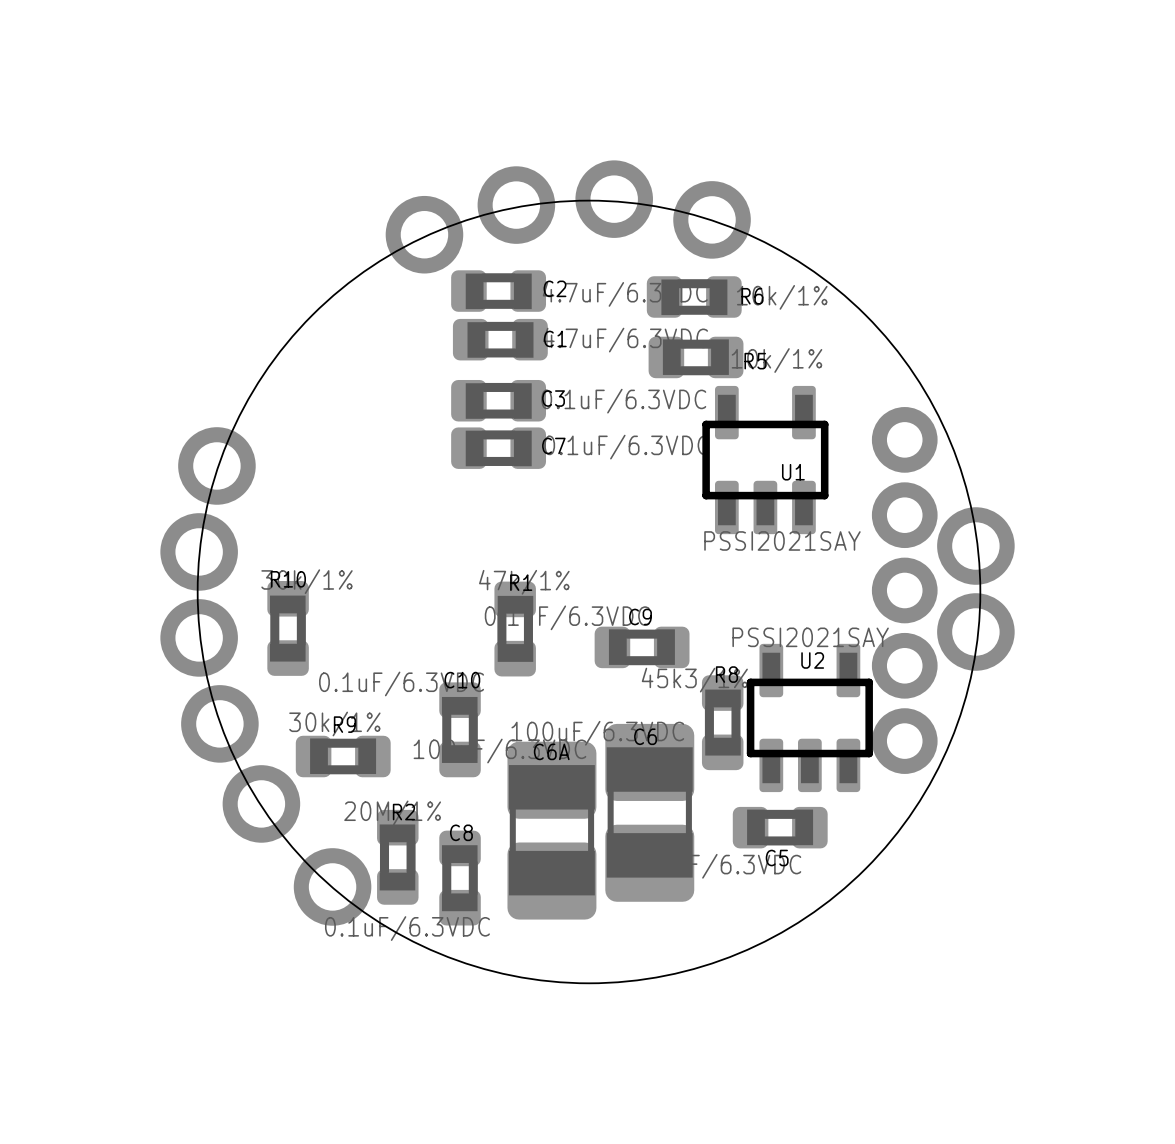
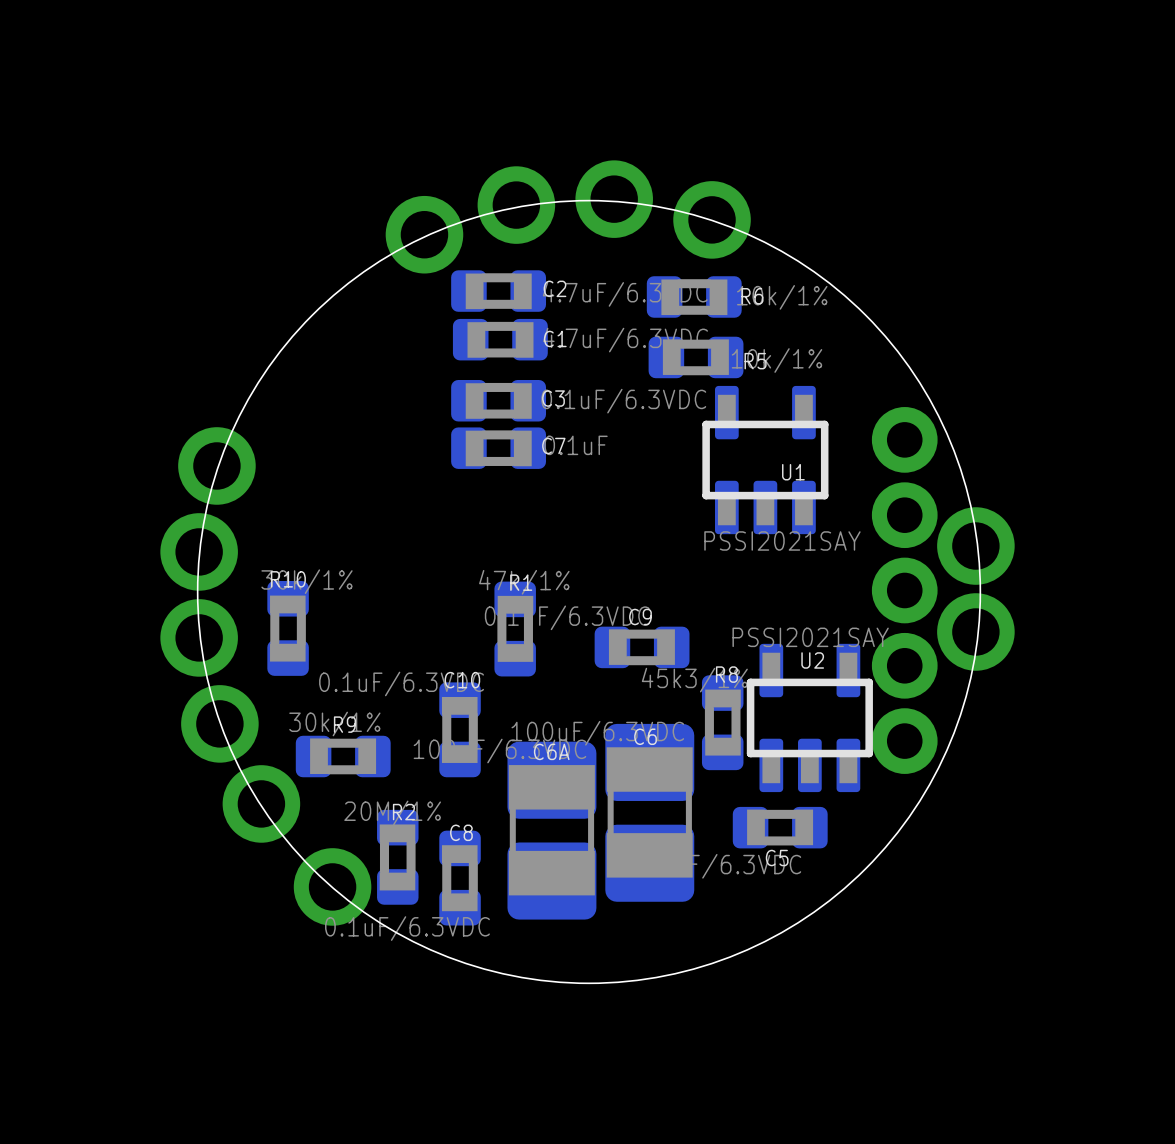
C7 value: 0.1uF/6.3VDC (626, 447) -> 0.1uF (576, 445)

